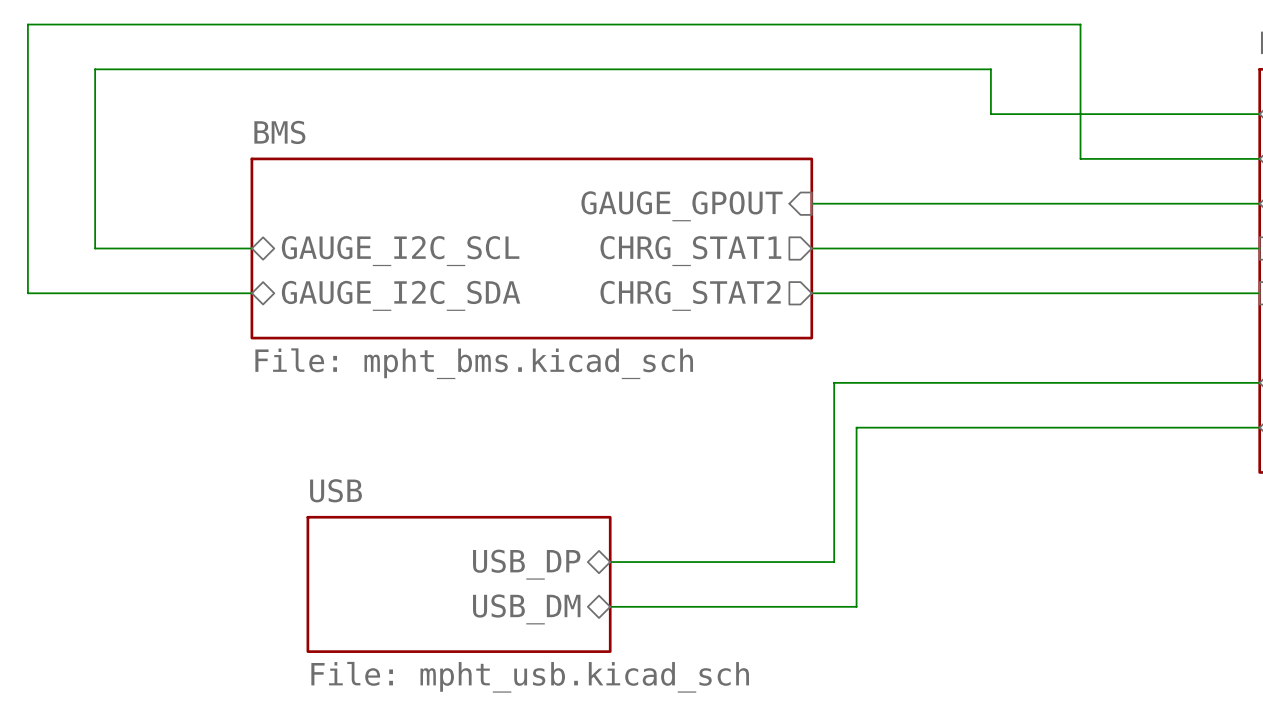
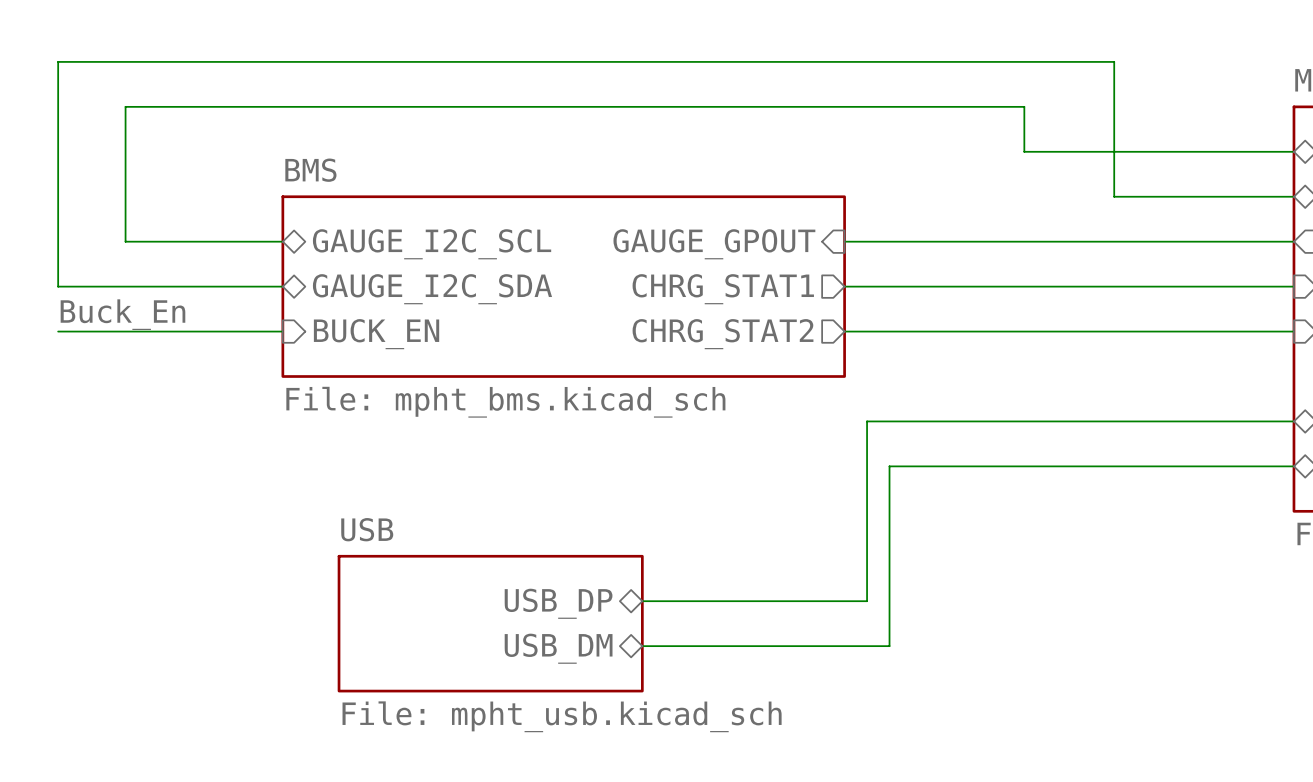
wire: (95, 203) (95, 248) -> (125, 241) (282, 241)
sheet pin: none -> GAUGE_I2C_SCL (432, 244)
wire: (27, 248) (27, 293) -> (58, 286) (125, 286)
sheet pin: GAUGE_I2C_SCL (400, 251) -> GAUGE_I2C_SDA (432, 289)
label: none -> Buck_En (122, 314)
sheet pin shape: bidirectional (401, 295) -> input (376, 334)
sheet pin: GAUGE_I2C_SDA (401, 295) -> BUCK_EN (376, 334)

